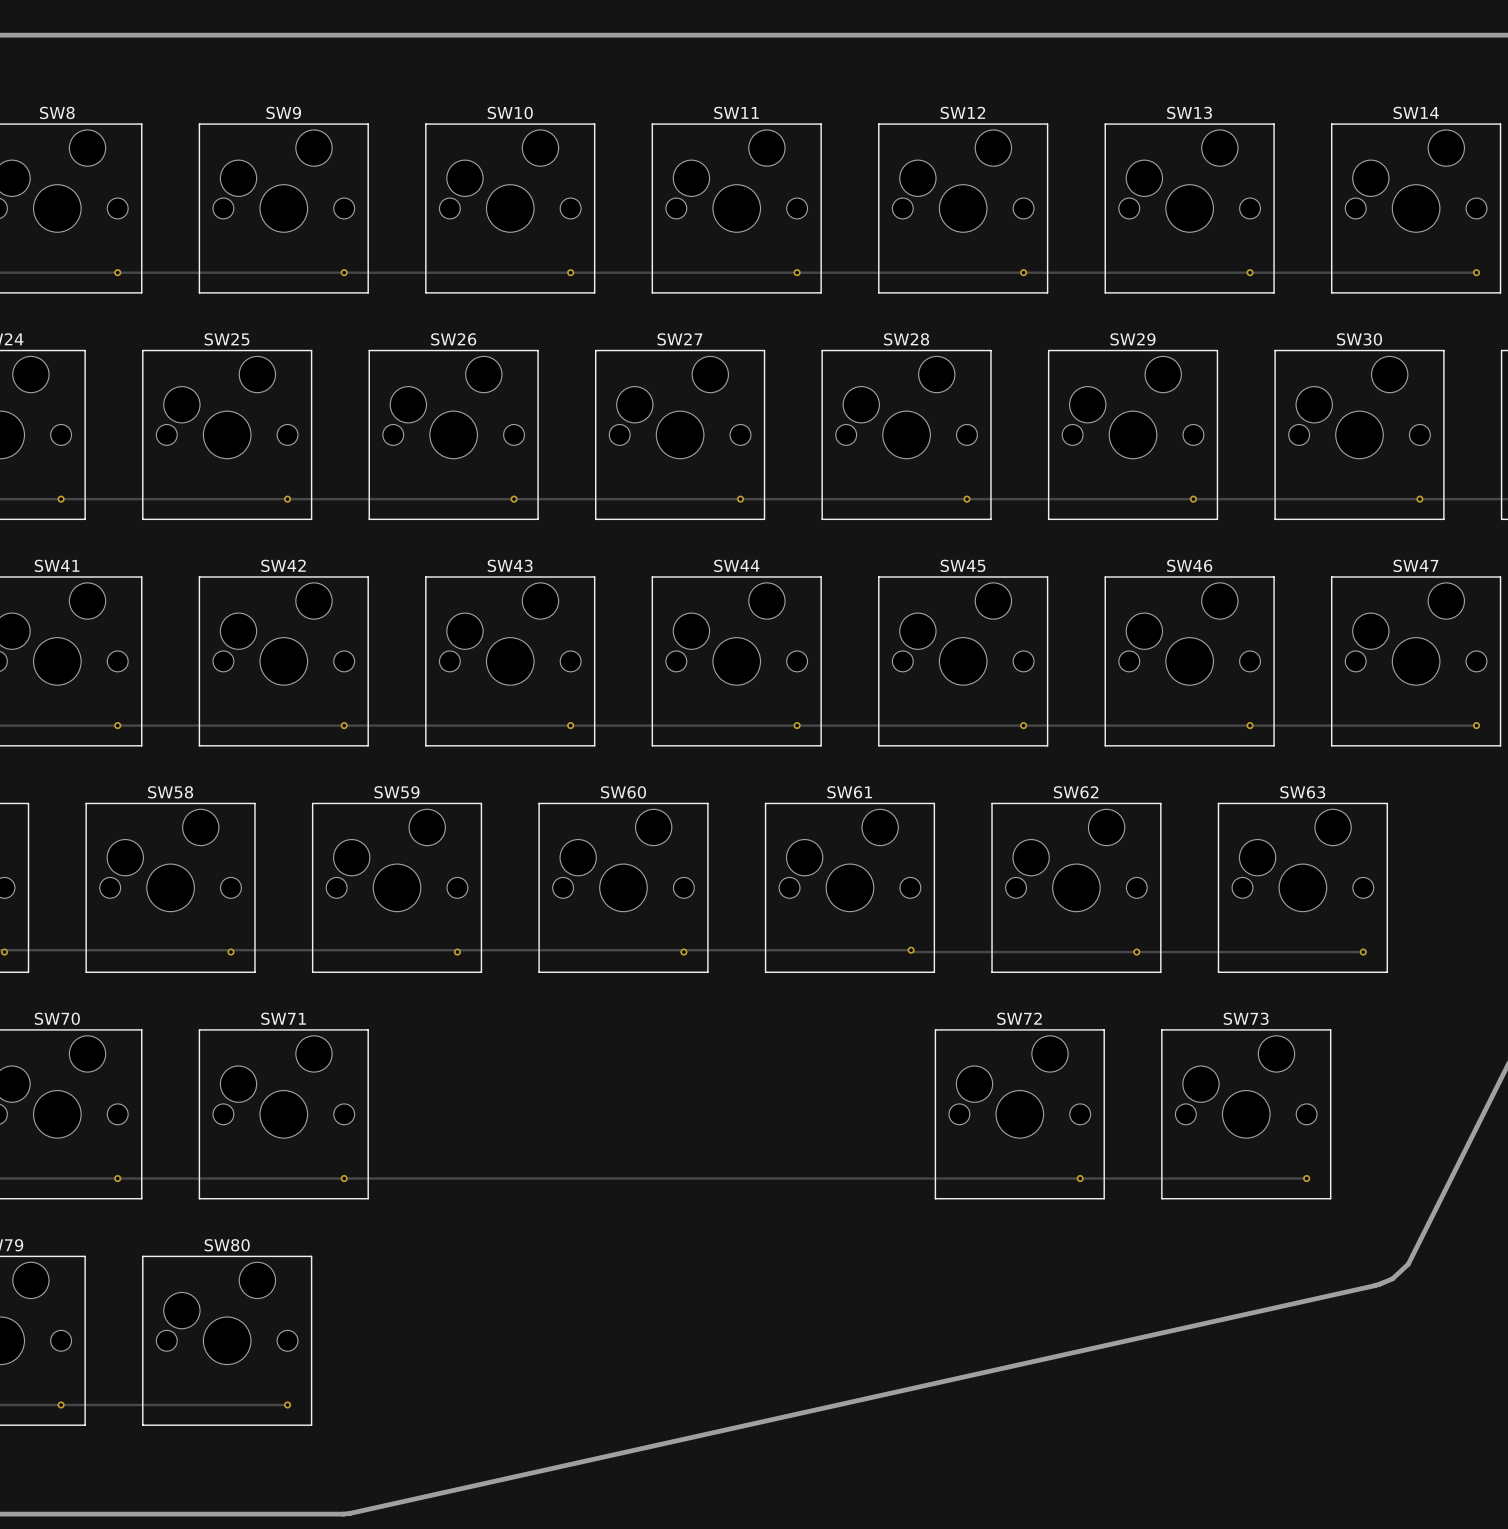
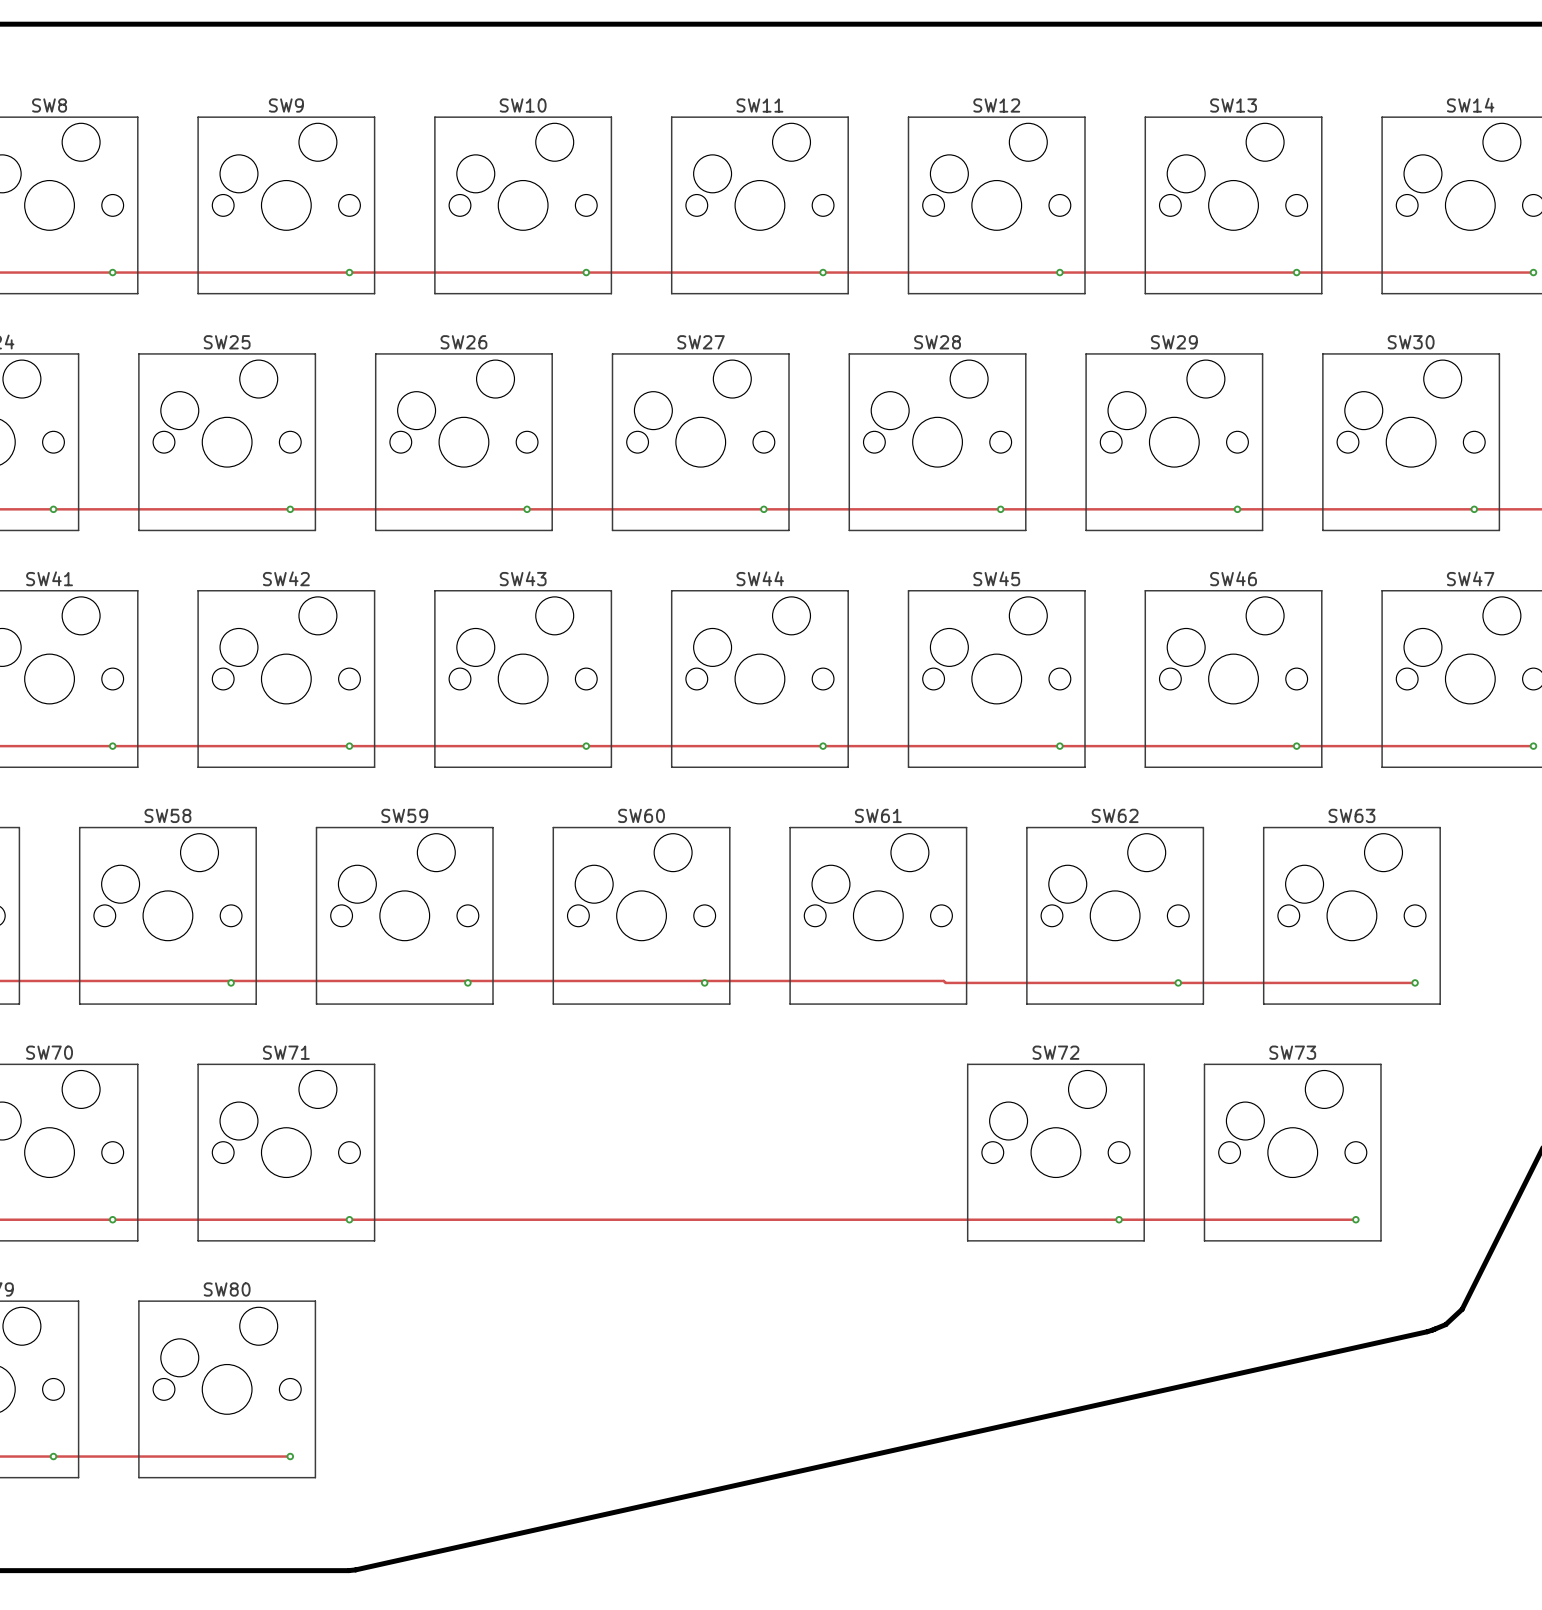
via: (911, 950) -> none

